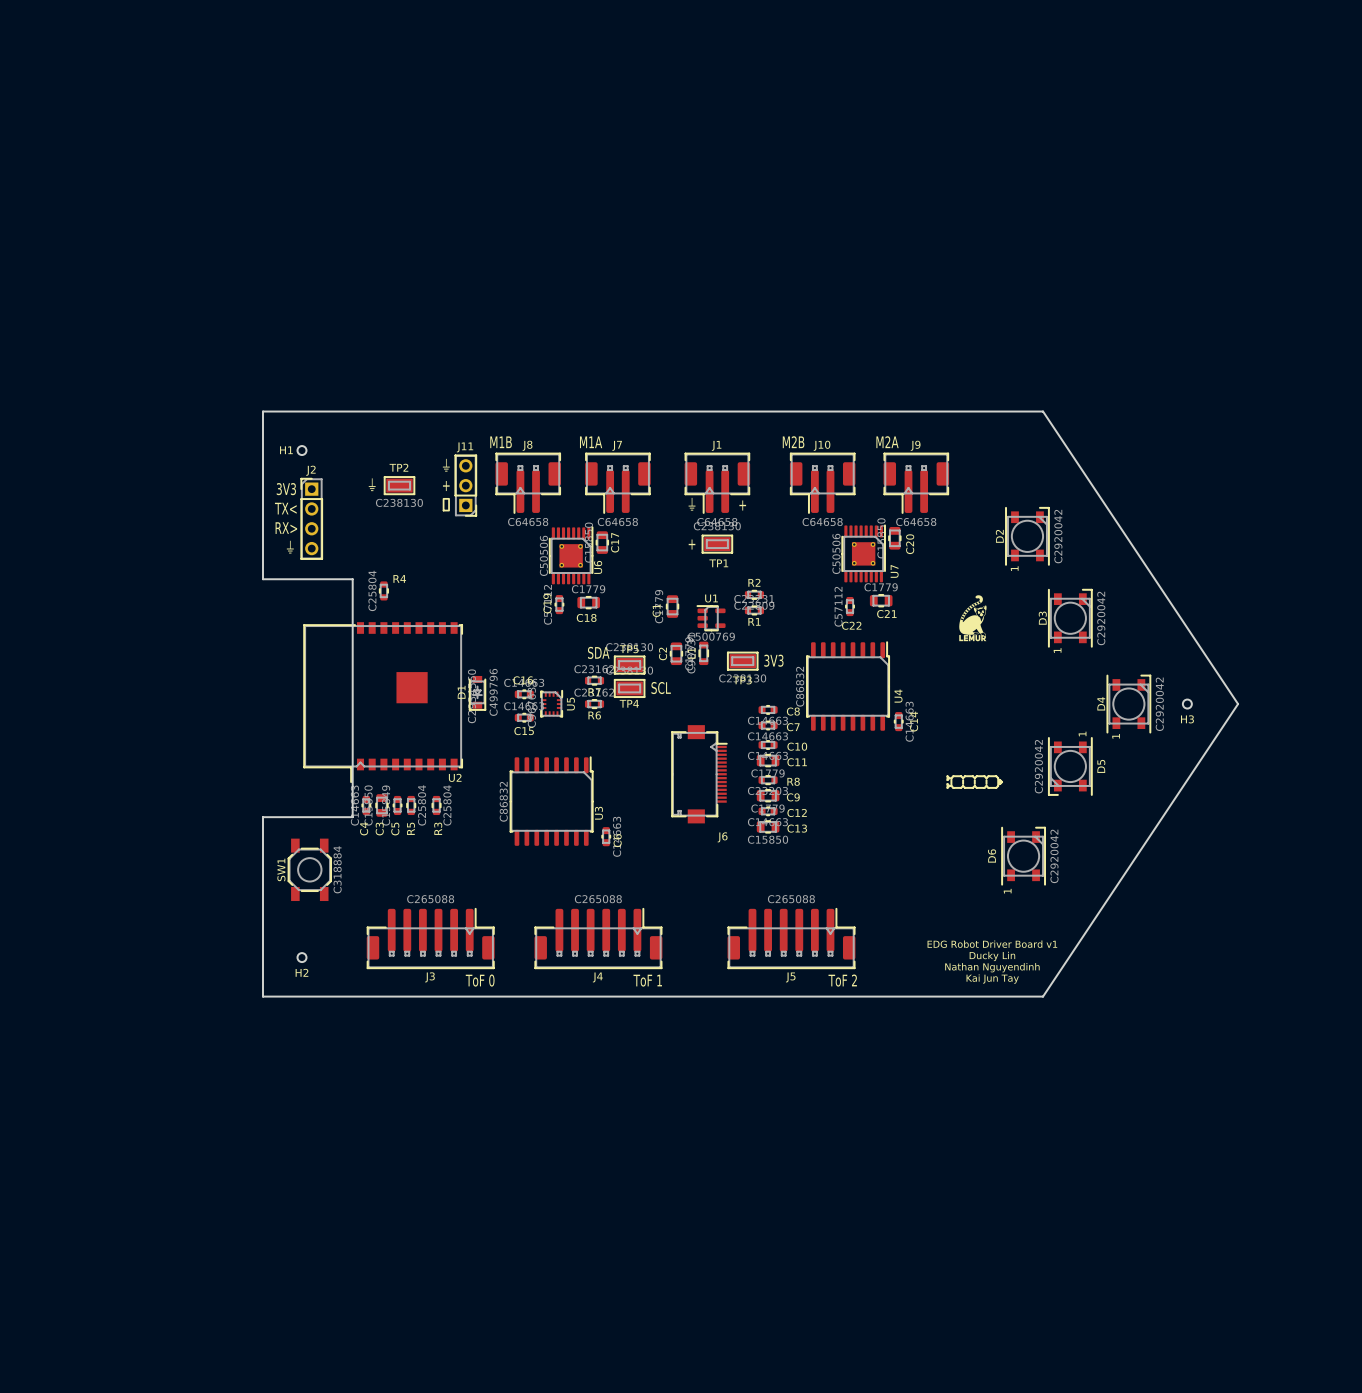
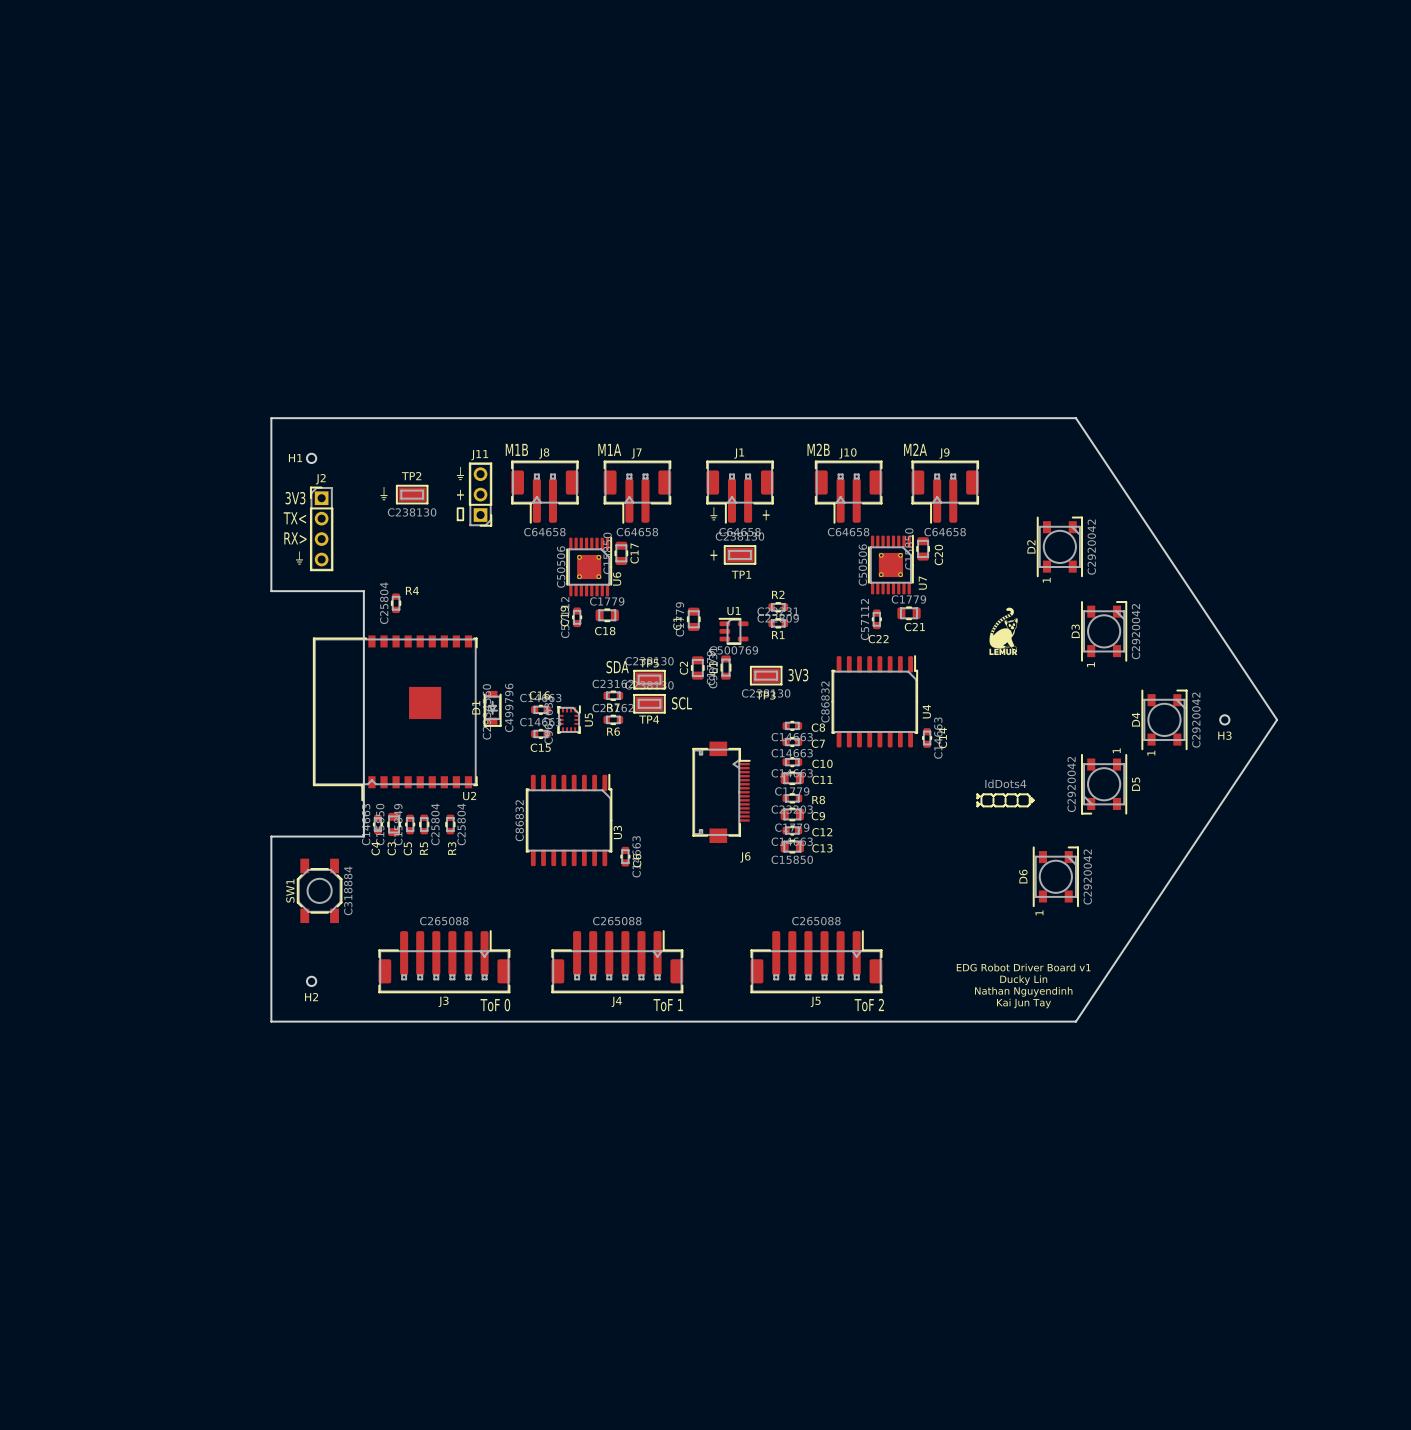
drawing shape: [947, 775, 1003, 789] -> [976, 779, 1035, 807]

